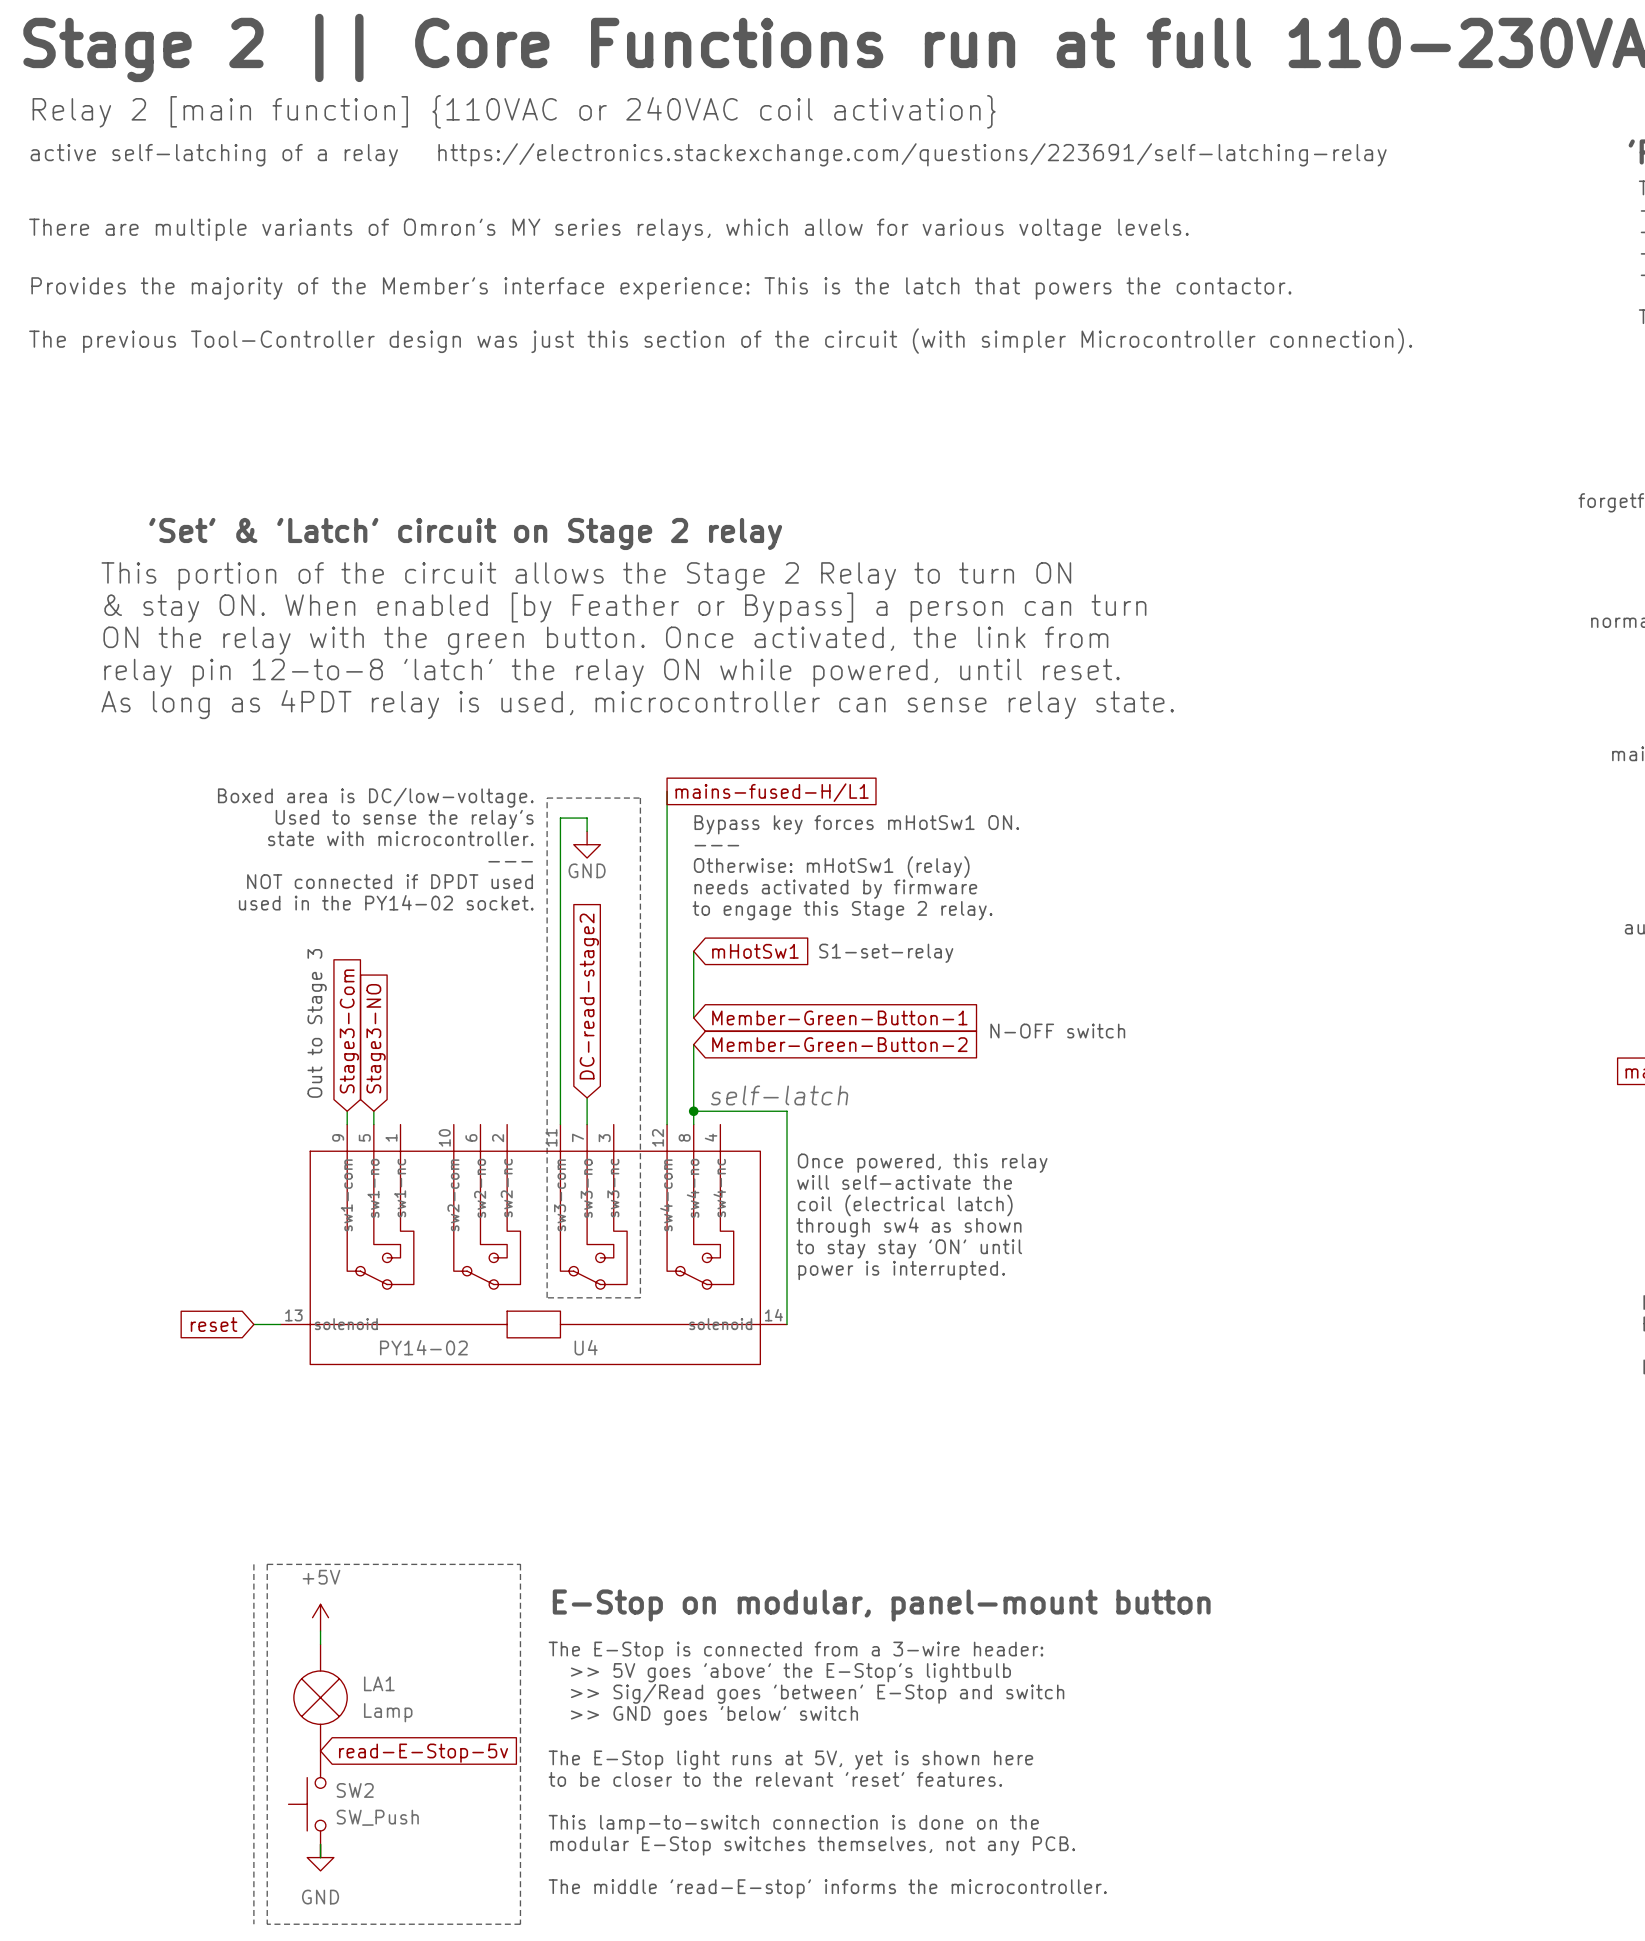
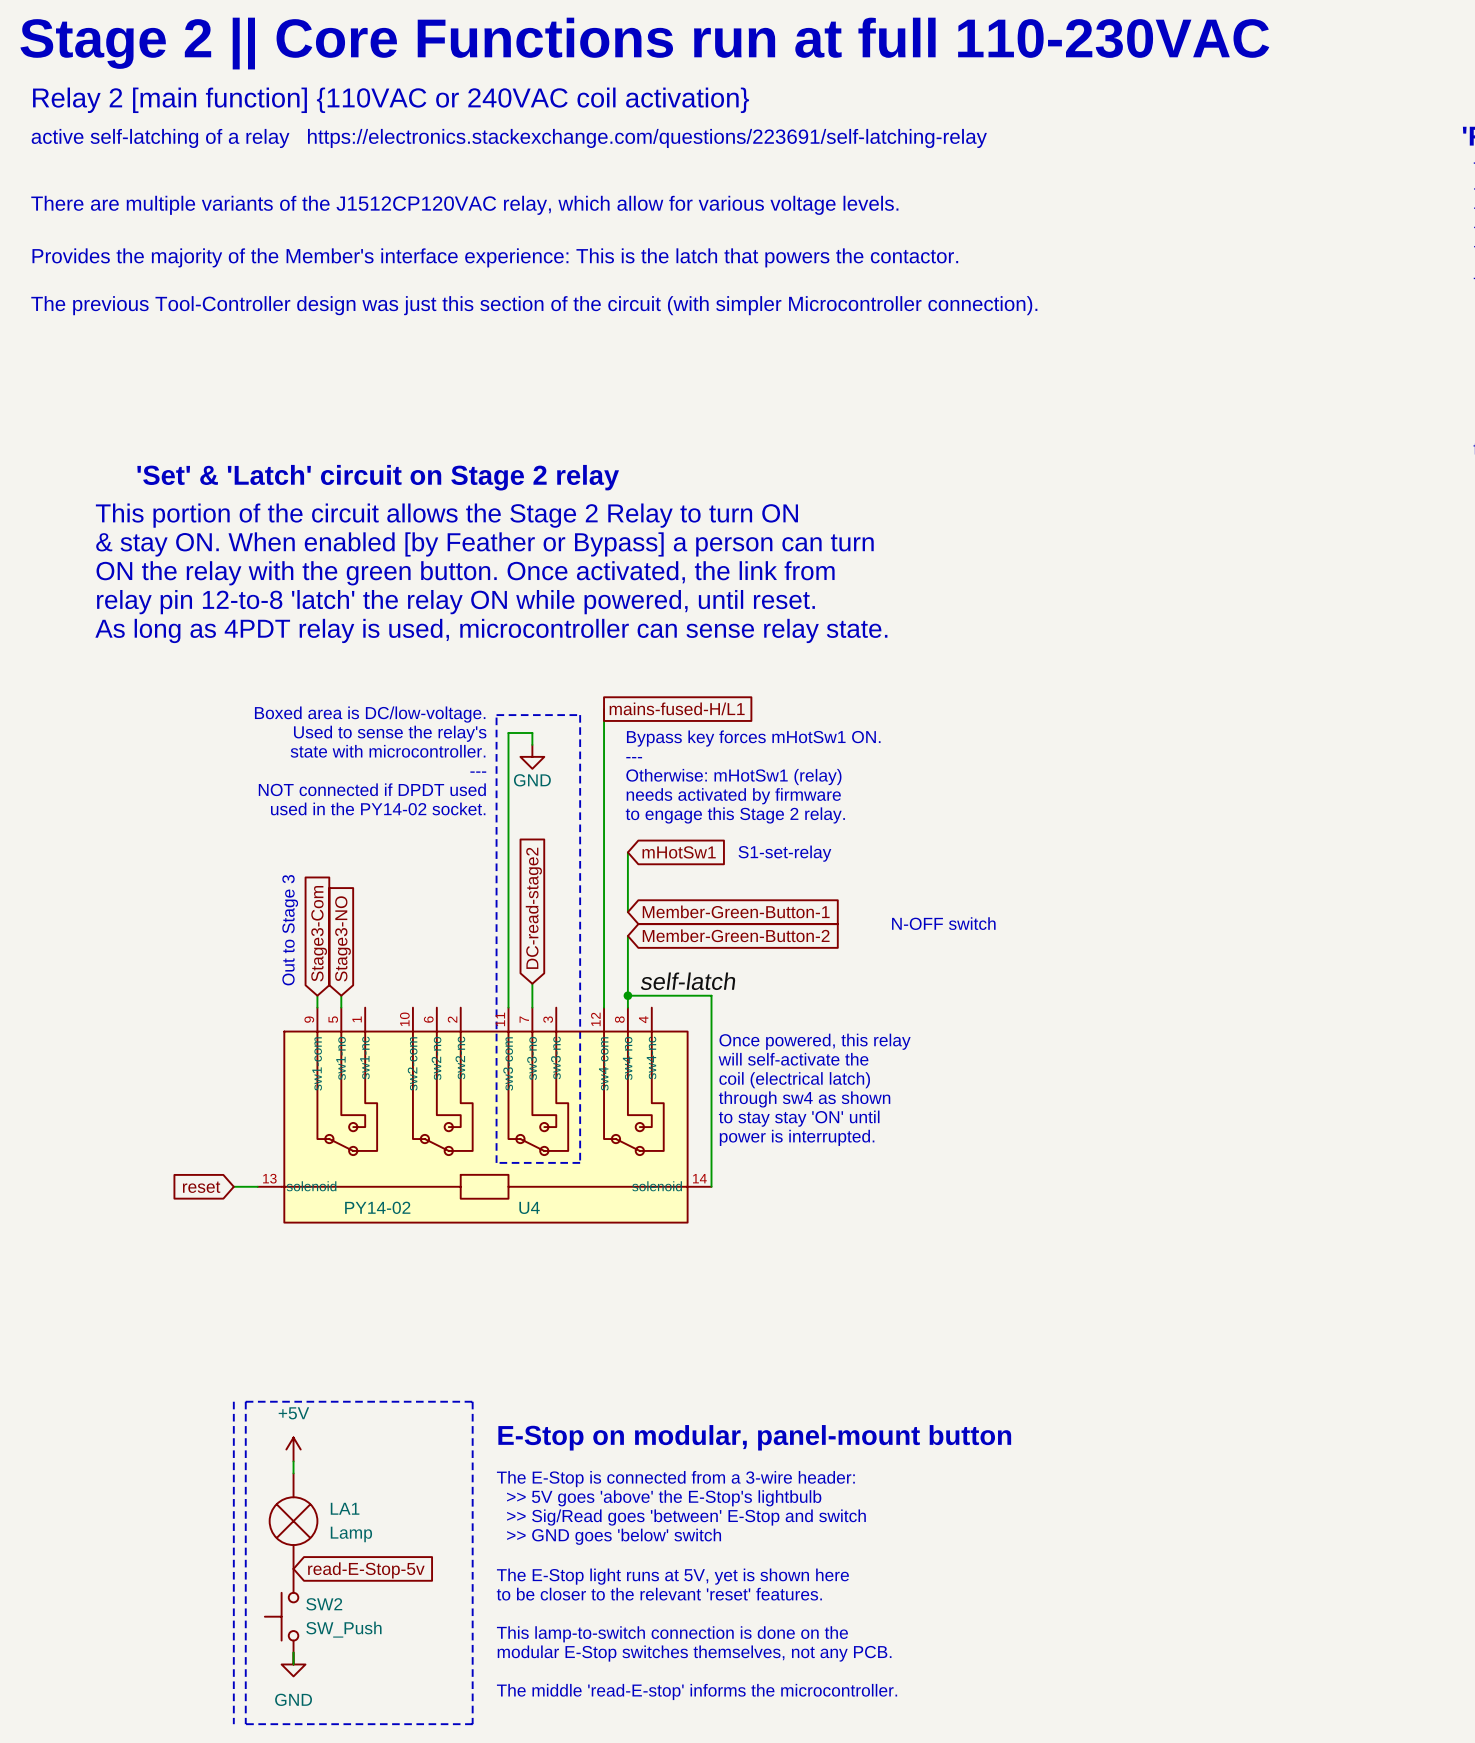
text: There are multiple variants of Omron's MY series relays, which allow for various voltage levels. (608, 229) -> There are multiple variants of the J1512CP120VAC relay, which allow for various voltage levels. (464, 205)

